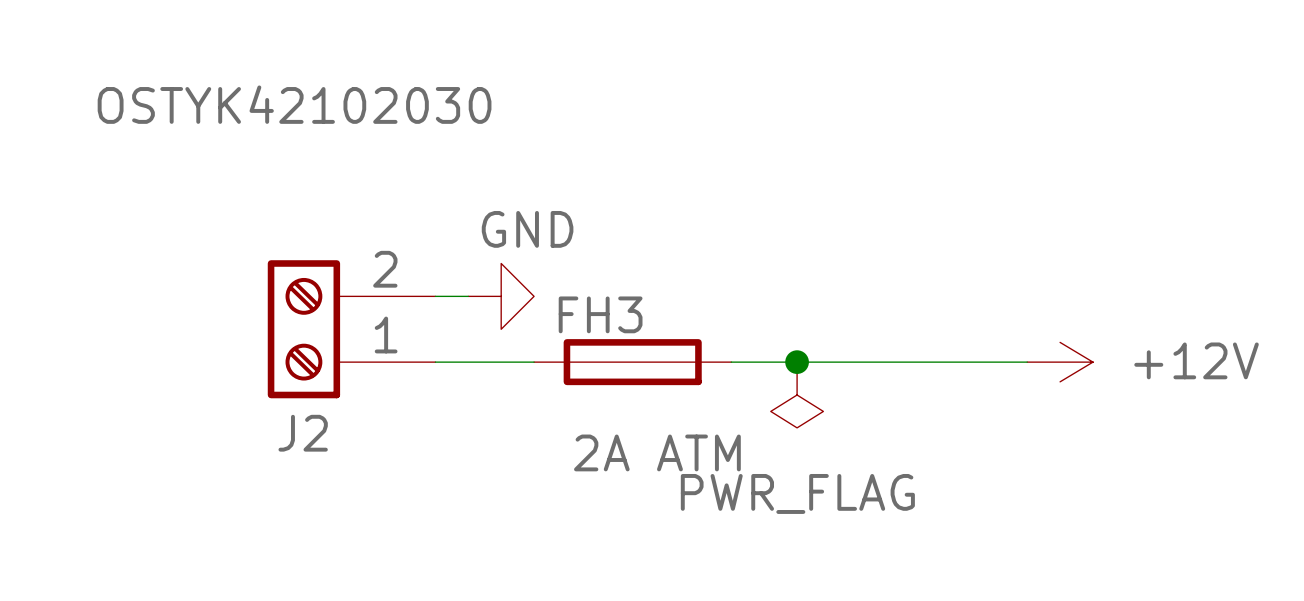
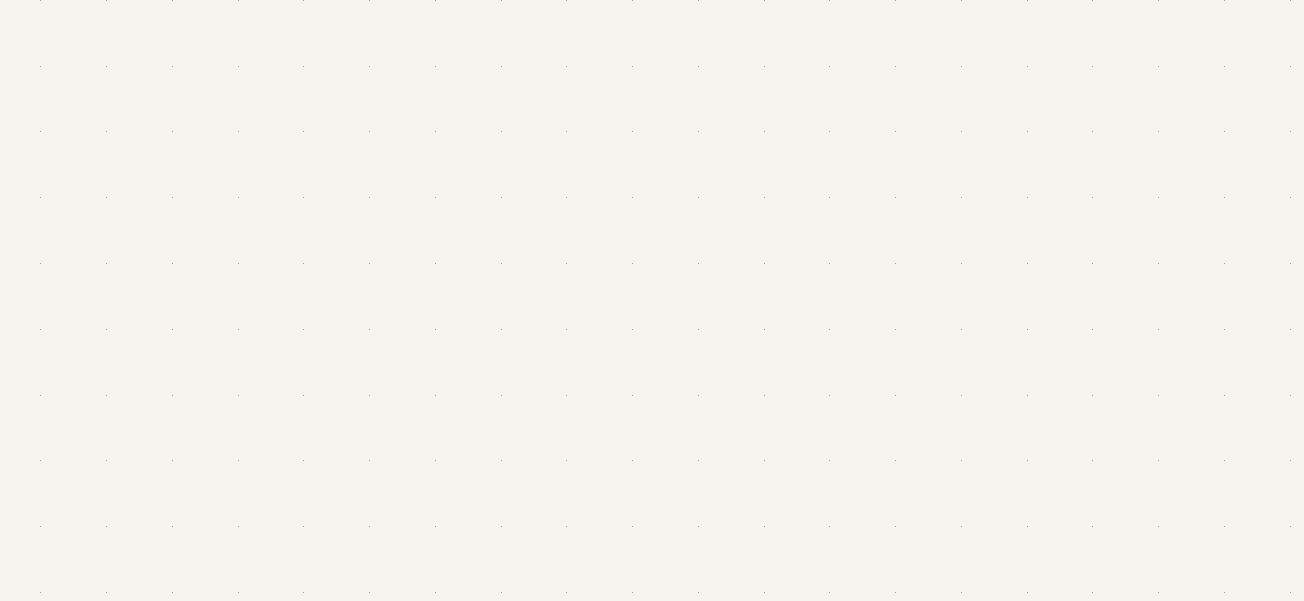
wire: (435, 296) (468, 296) -> none
power symbol: GND (501, 296) -> none
J2: OSTYK42102030 (351, 329) -> none
wire: (435, 362) (534, 362) -> none
FH3: 2A ATM (632, 362) -> none
wire: (731, 362) (1027, 362) -> none
junction: (797, 362) -> none
power symbol: +12V (1060, 362) -> none
power symbol: PWR_FLAG (797, 395) -> none

